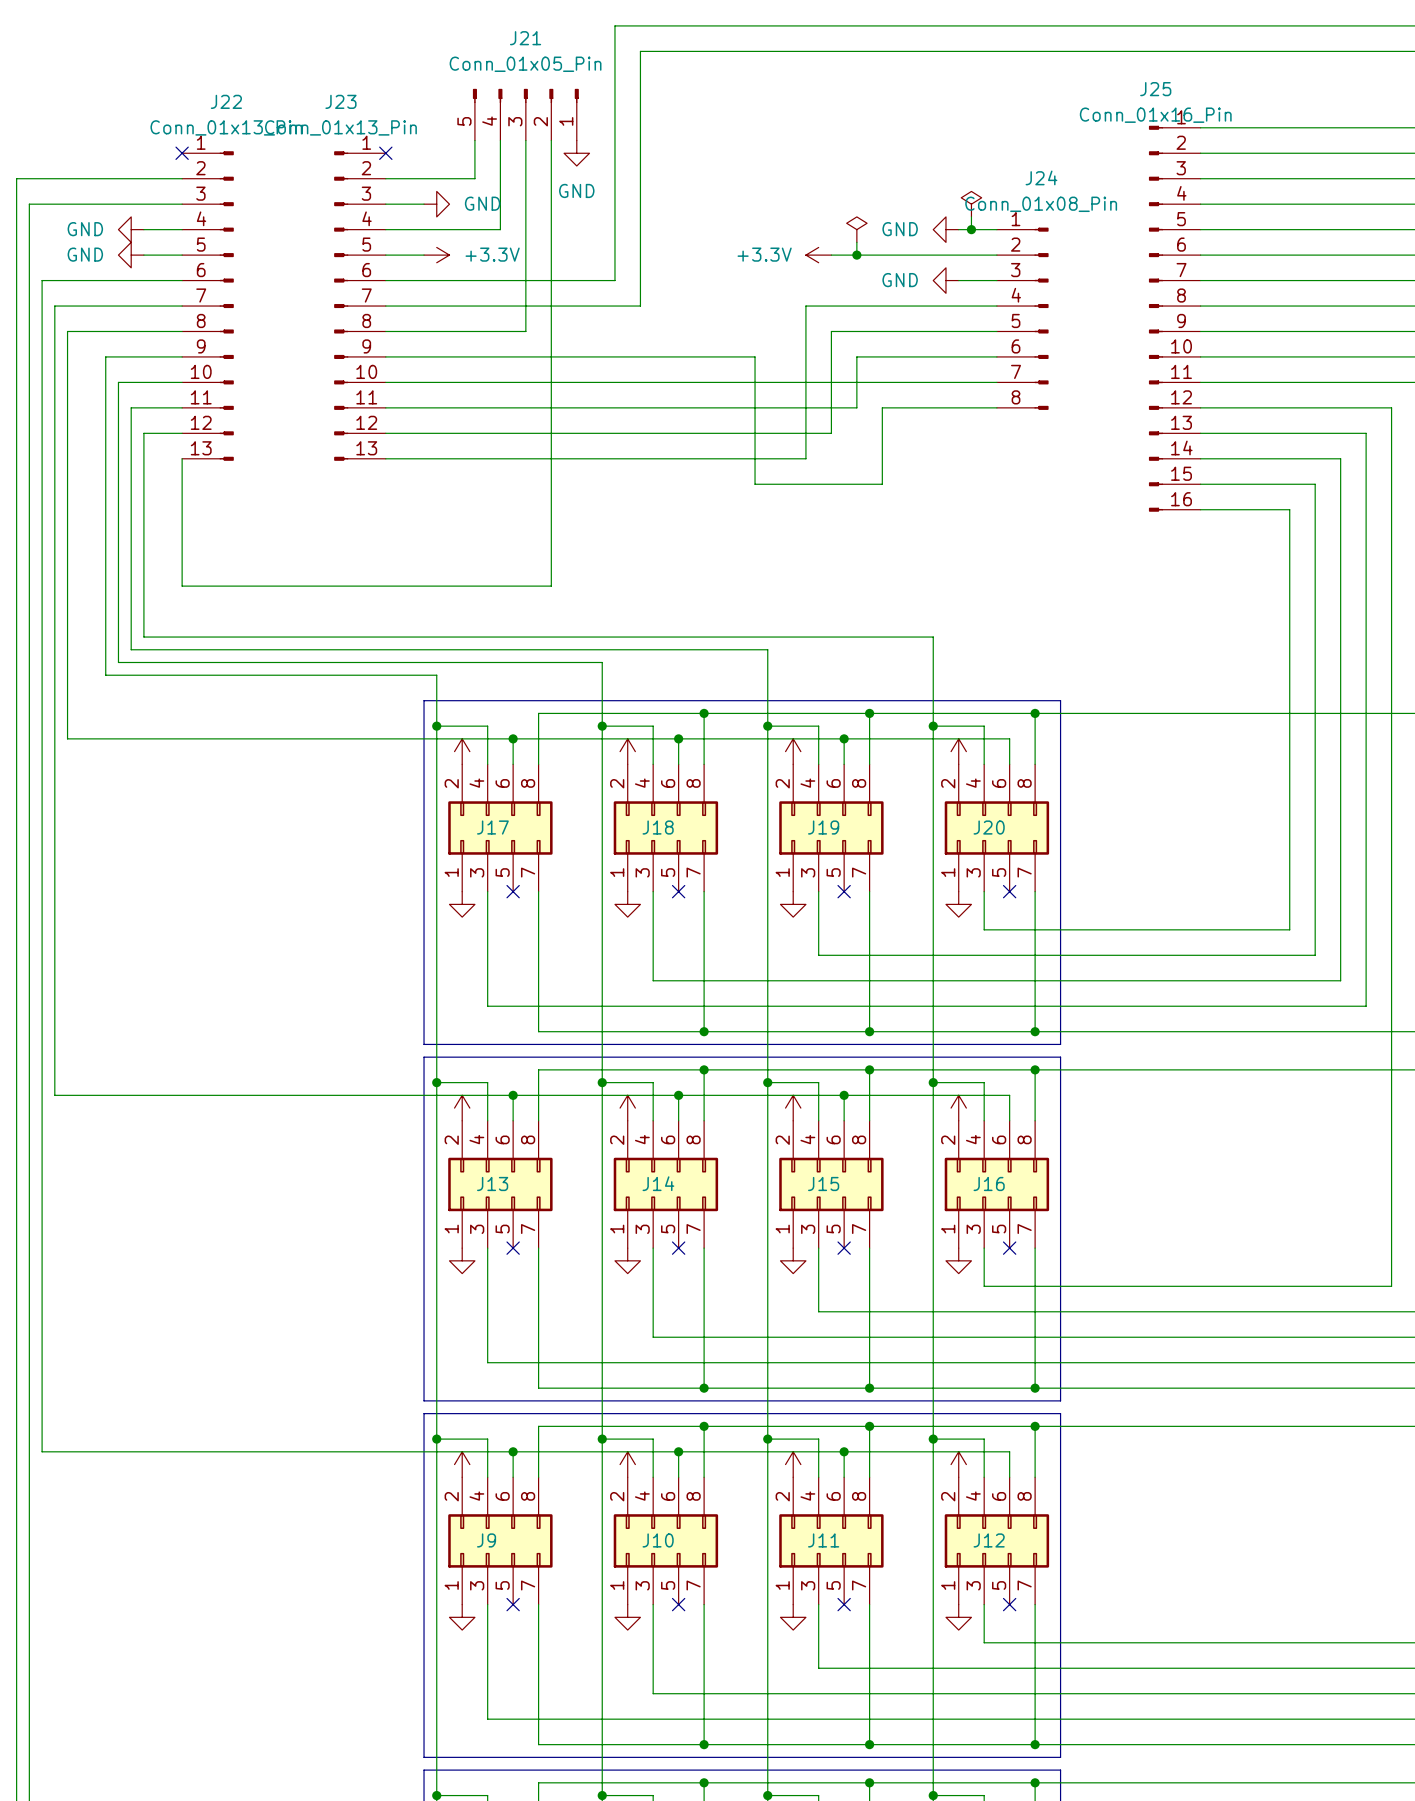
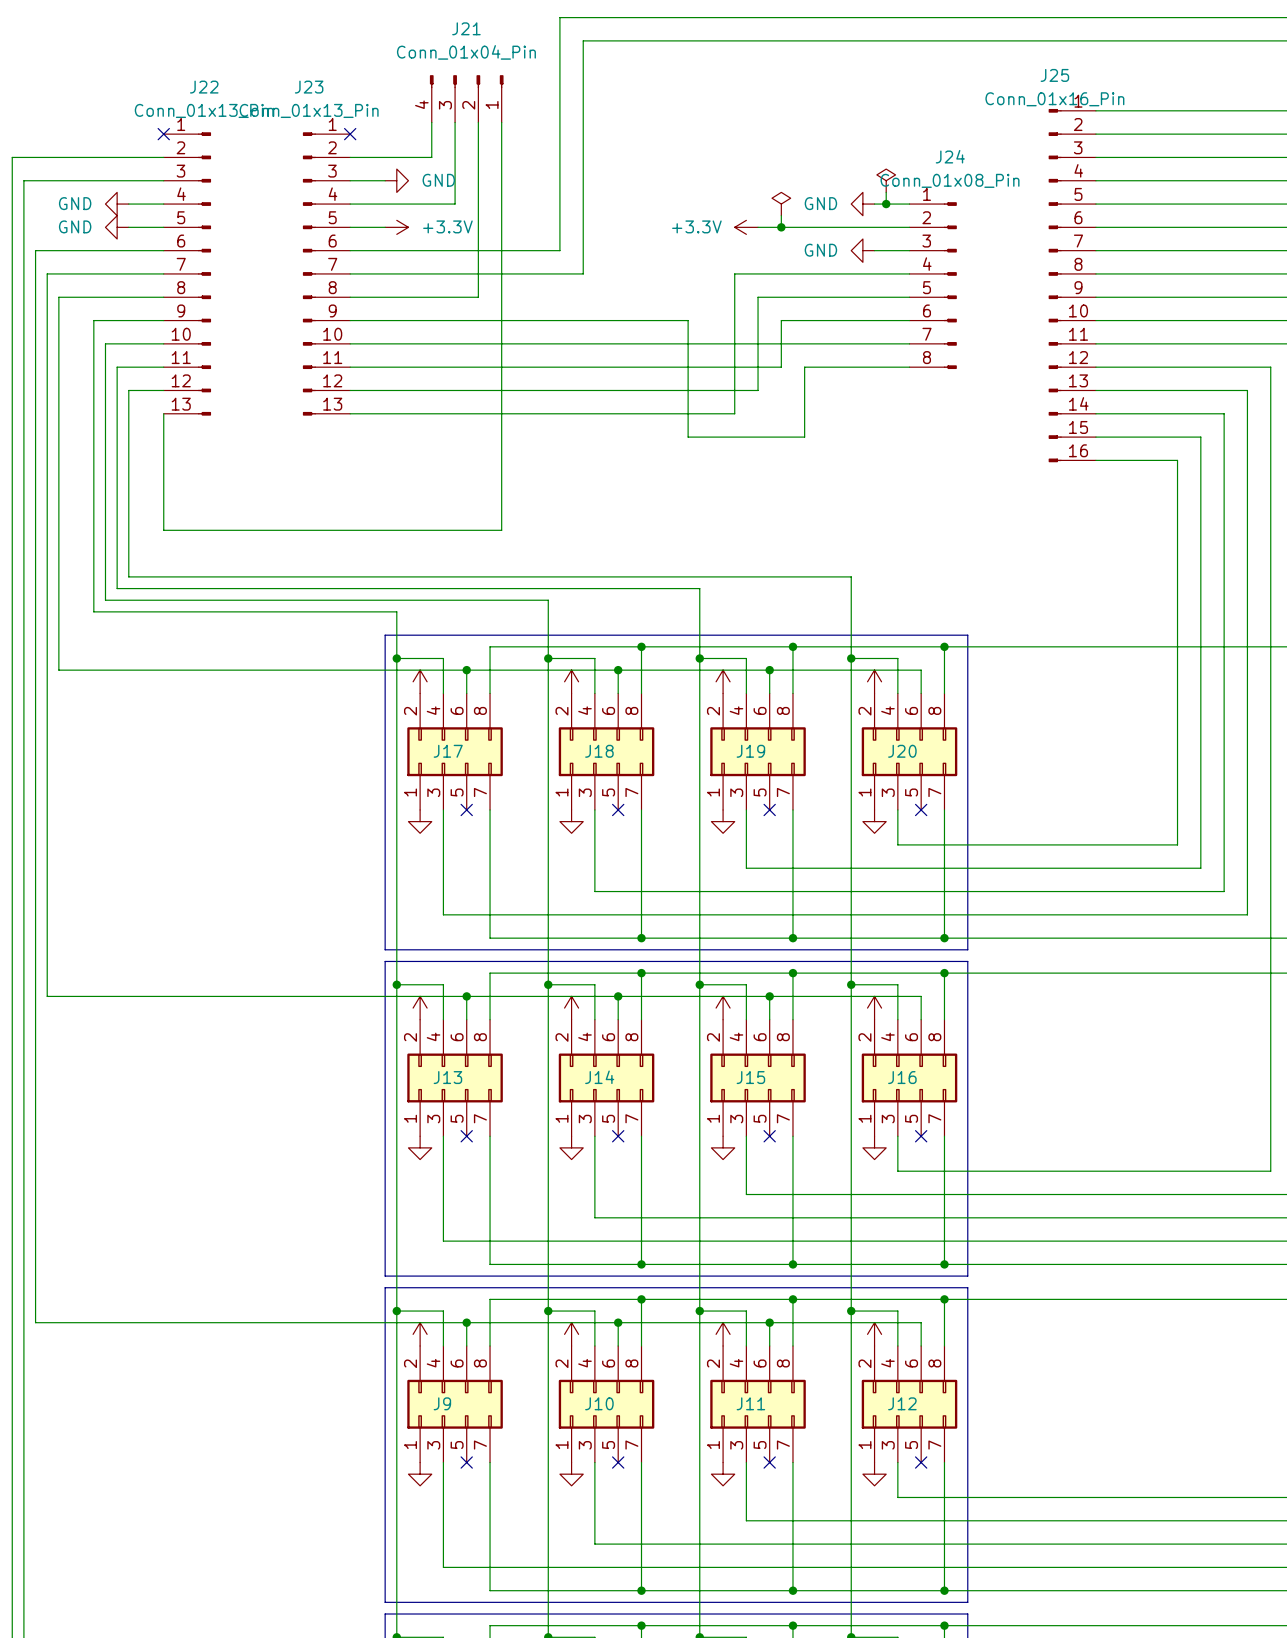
J21 value: Conn_01x05_Pin (525, 64) -> Conn_01x04_Pin (466, 52)
J21 symbol: [472, 88, 579, 141] -> [429, 75, 504, 123]
power symbol: GND (576, 153) -> none

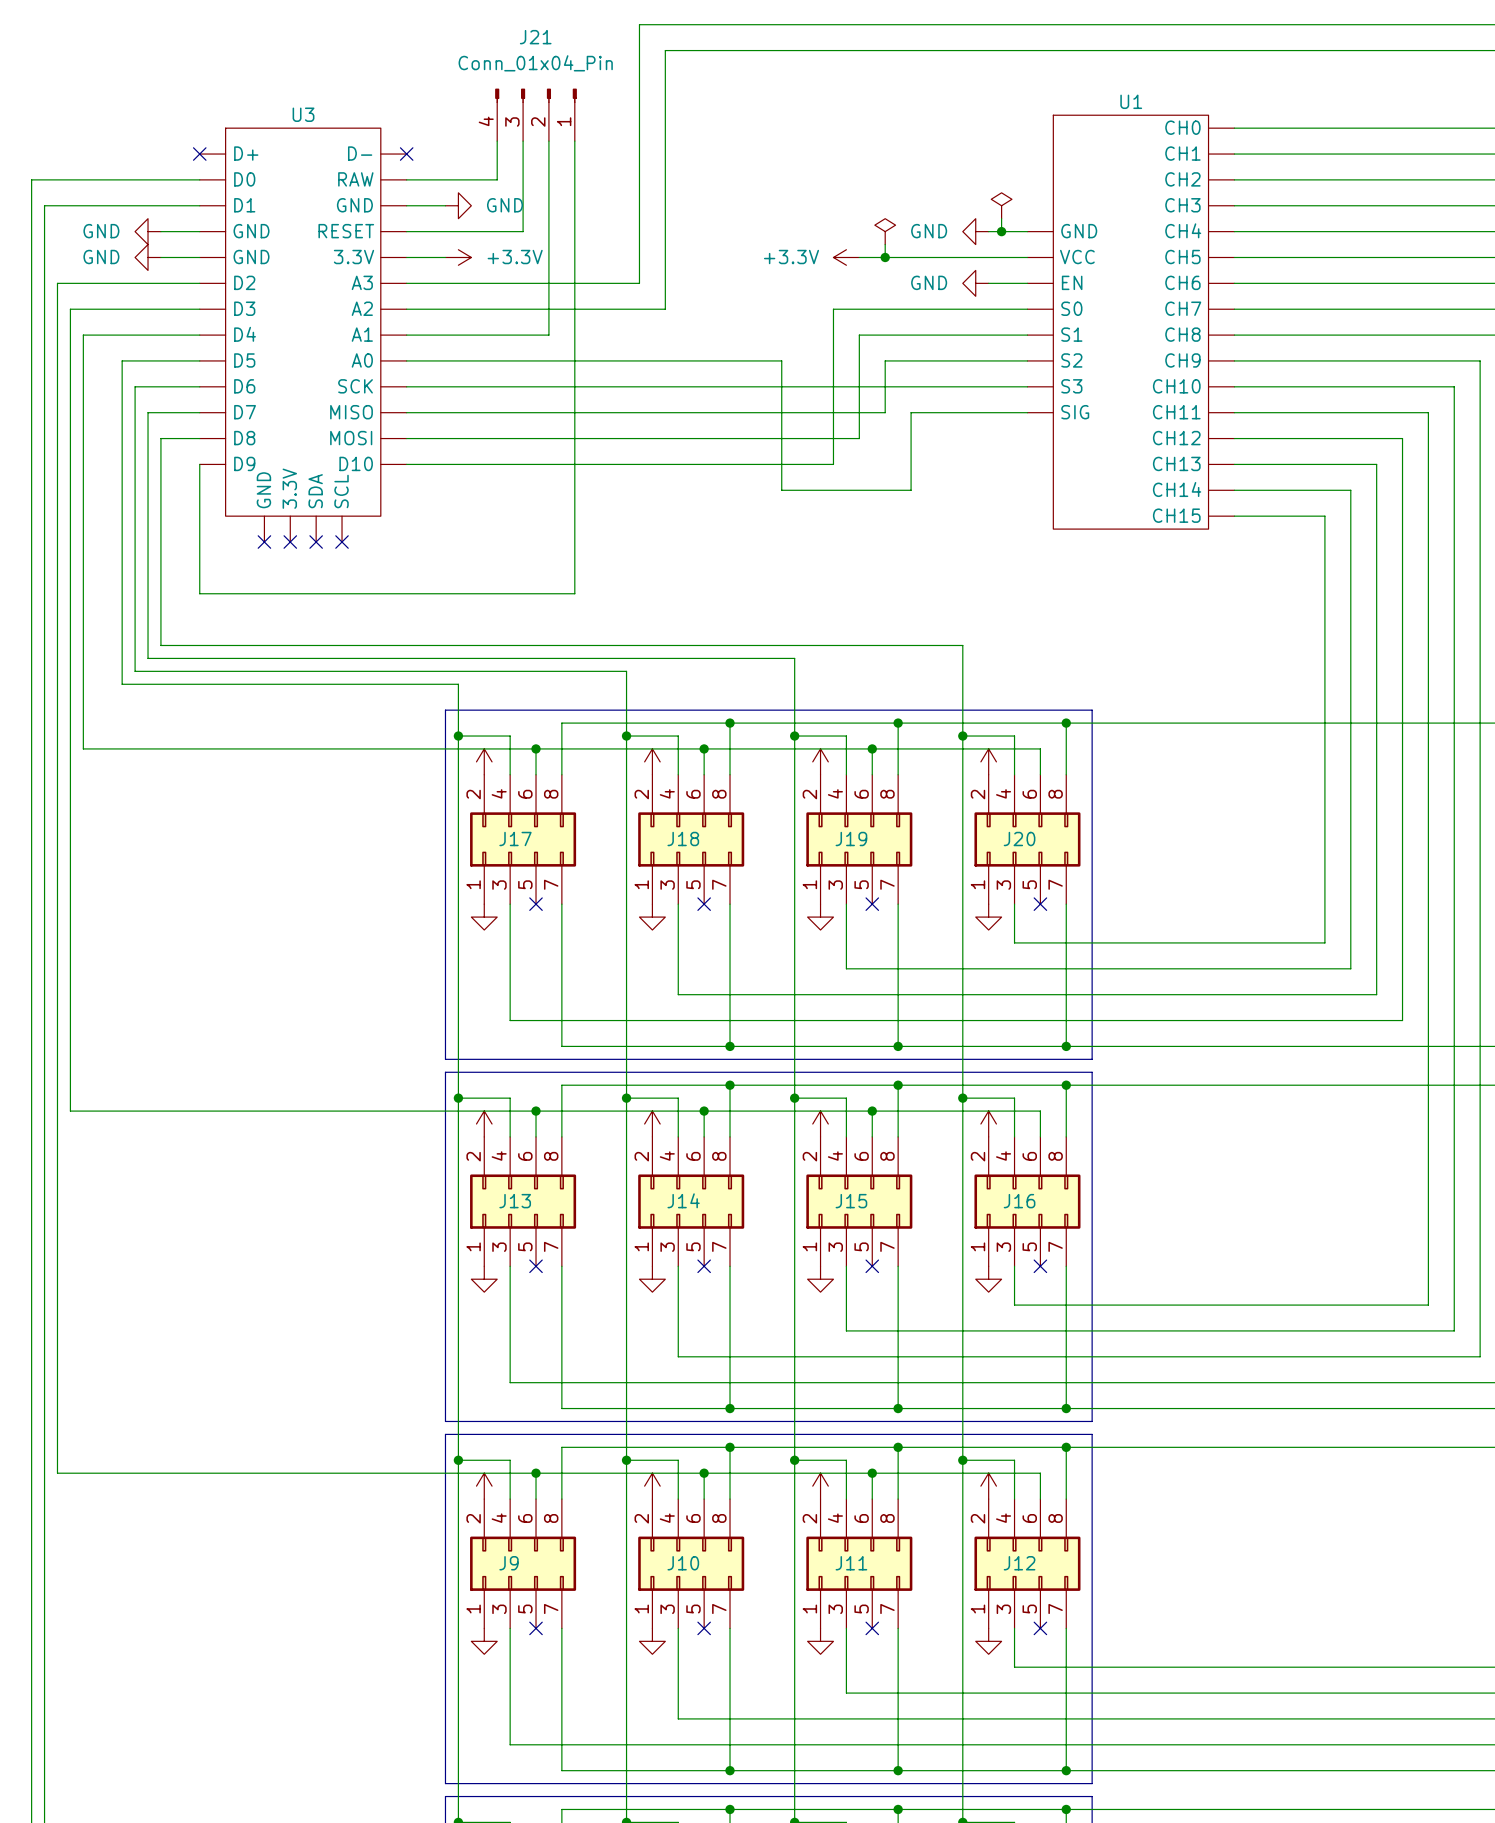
J22: Conn_01x13_Pin (187, 273) -> none
J23: Conn_01x13_Pin (326, 273) -> none
J24: Conn_01x08_Pin (933, 285) -> none
U1: none -> (1130, 322)
J25: Conn_01x16_Pin (1072, 285) -> none
U3: none -> (303, 335)
no-connect mark: none -> (264, 542)
no-connect mark: none -> (290, 542)
no-connect mark: none -> (316, 542)
no-connect mark: none -> (342, 542)

